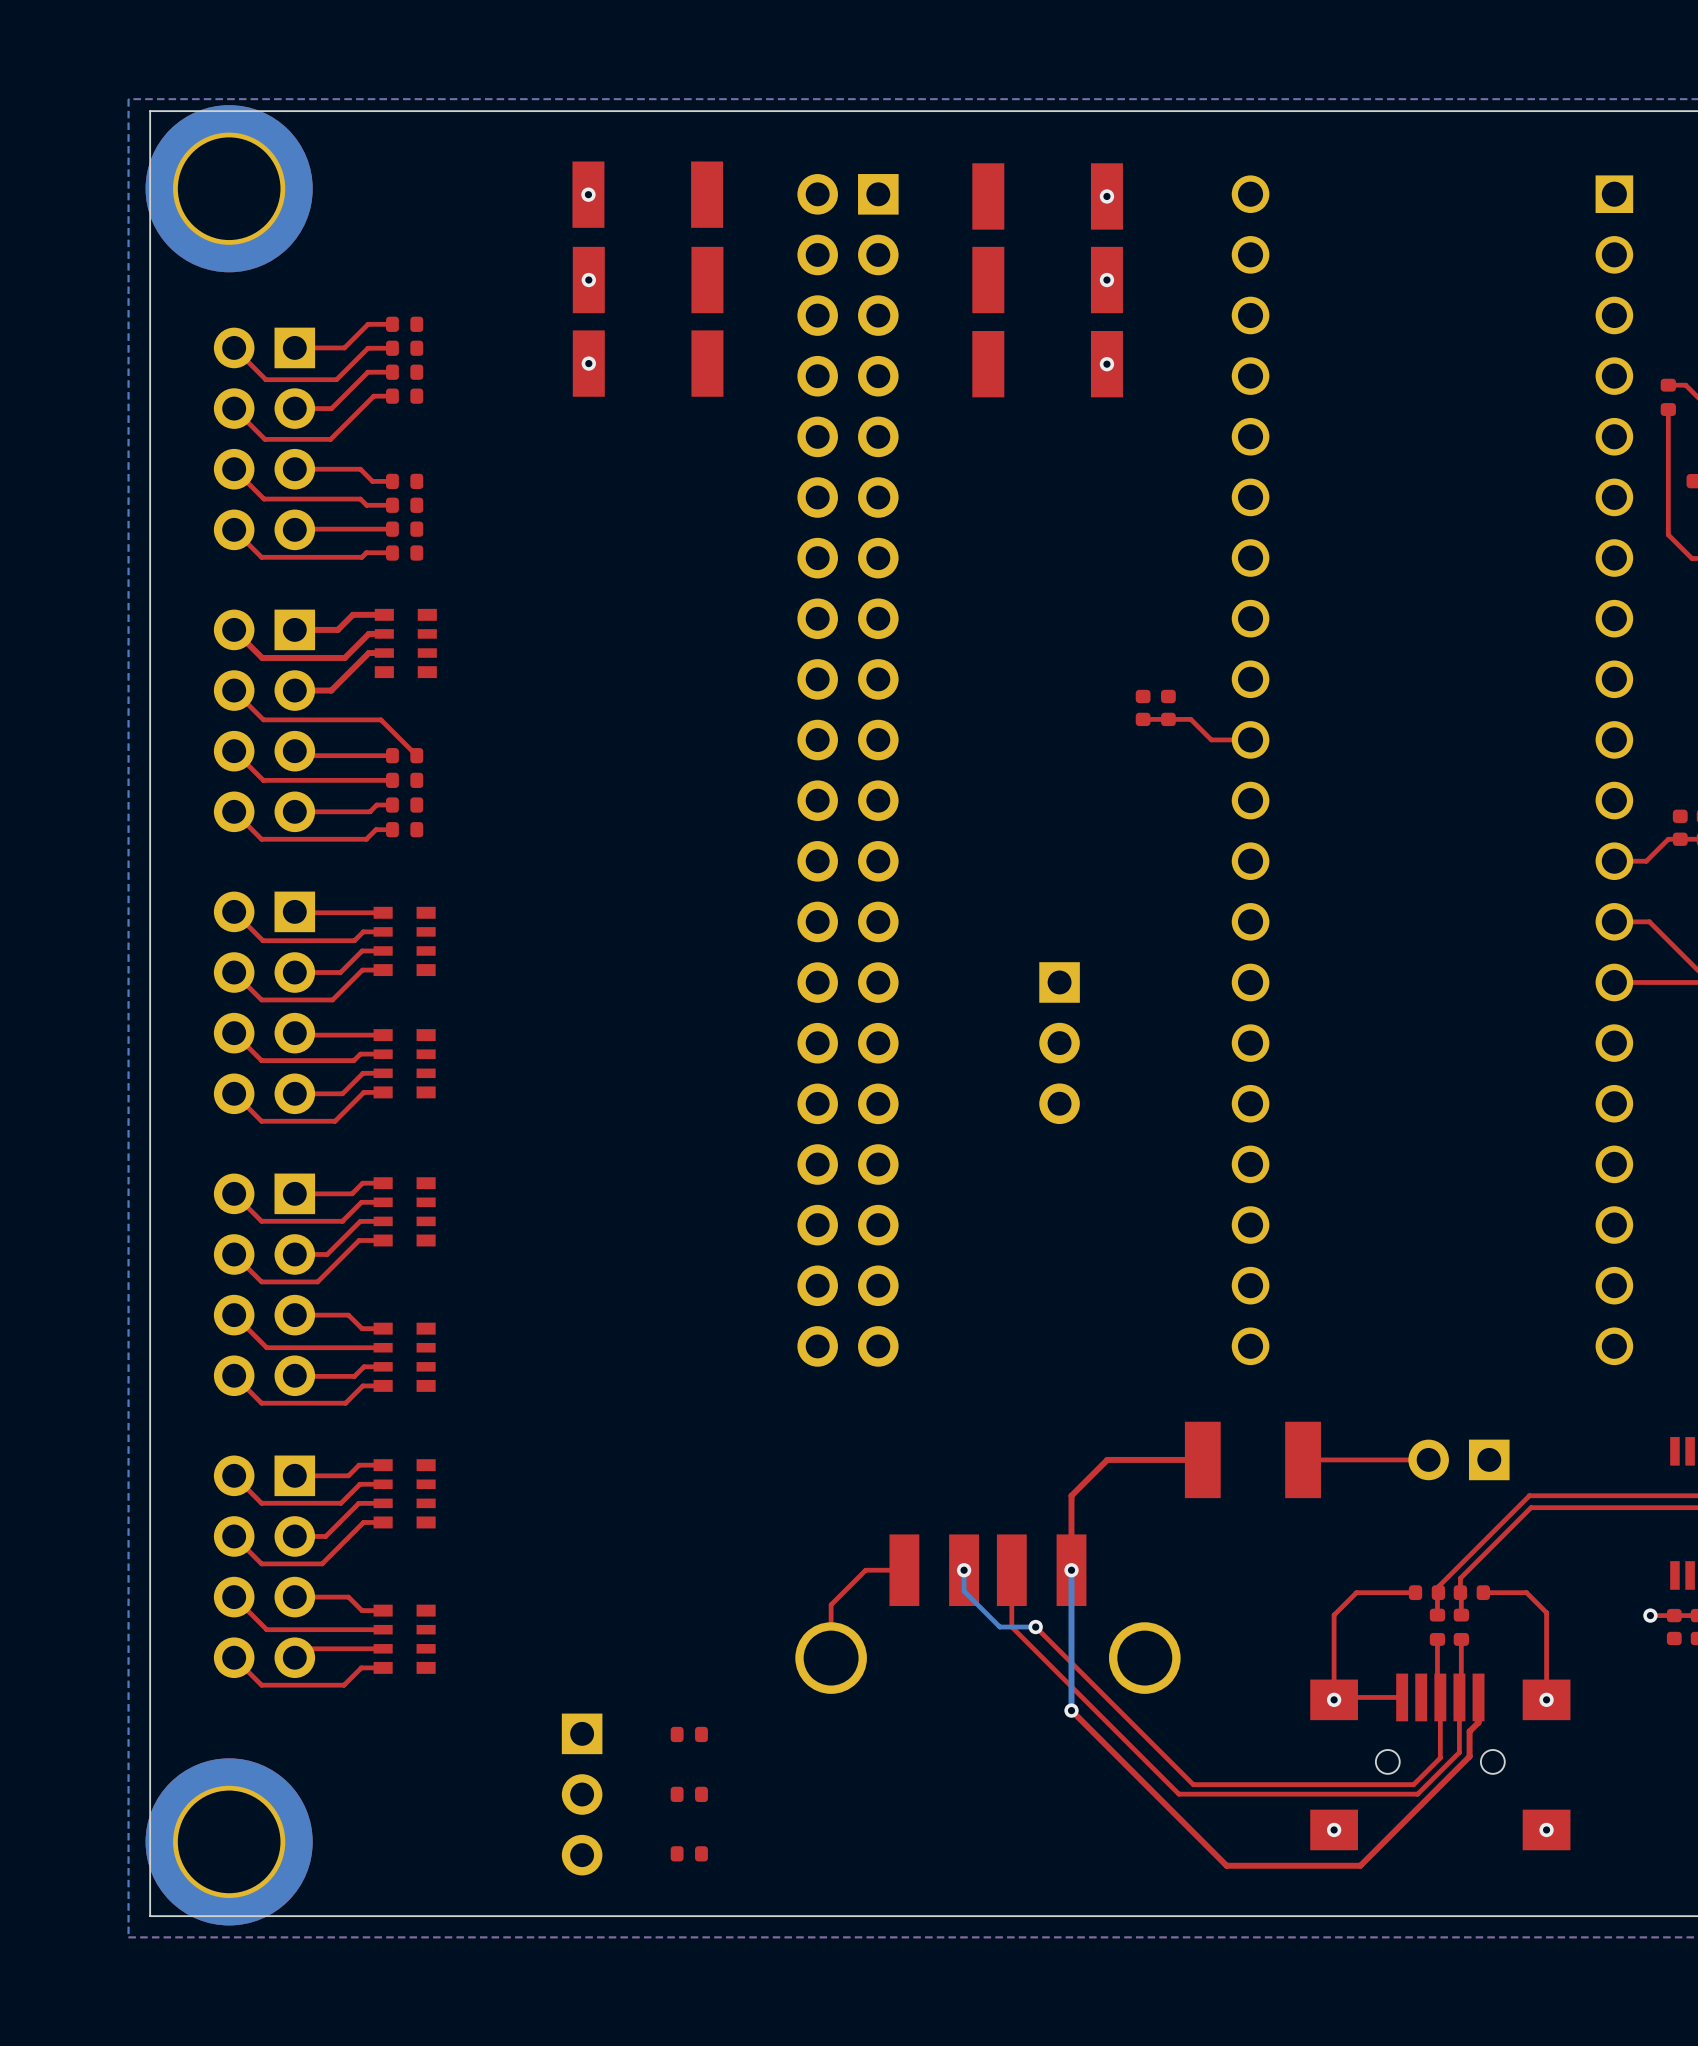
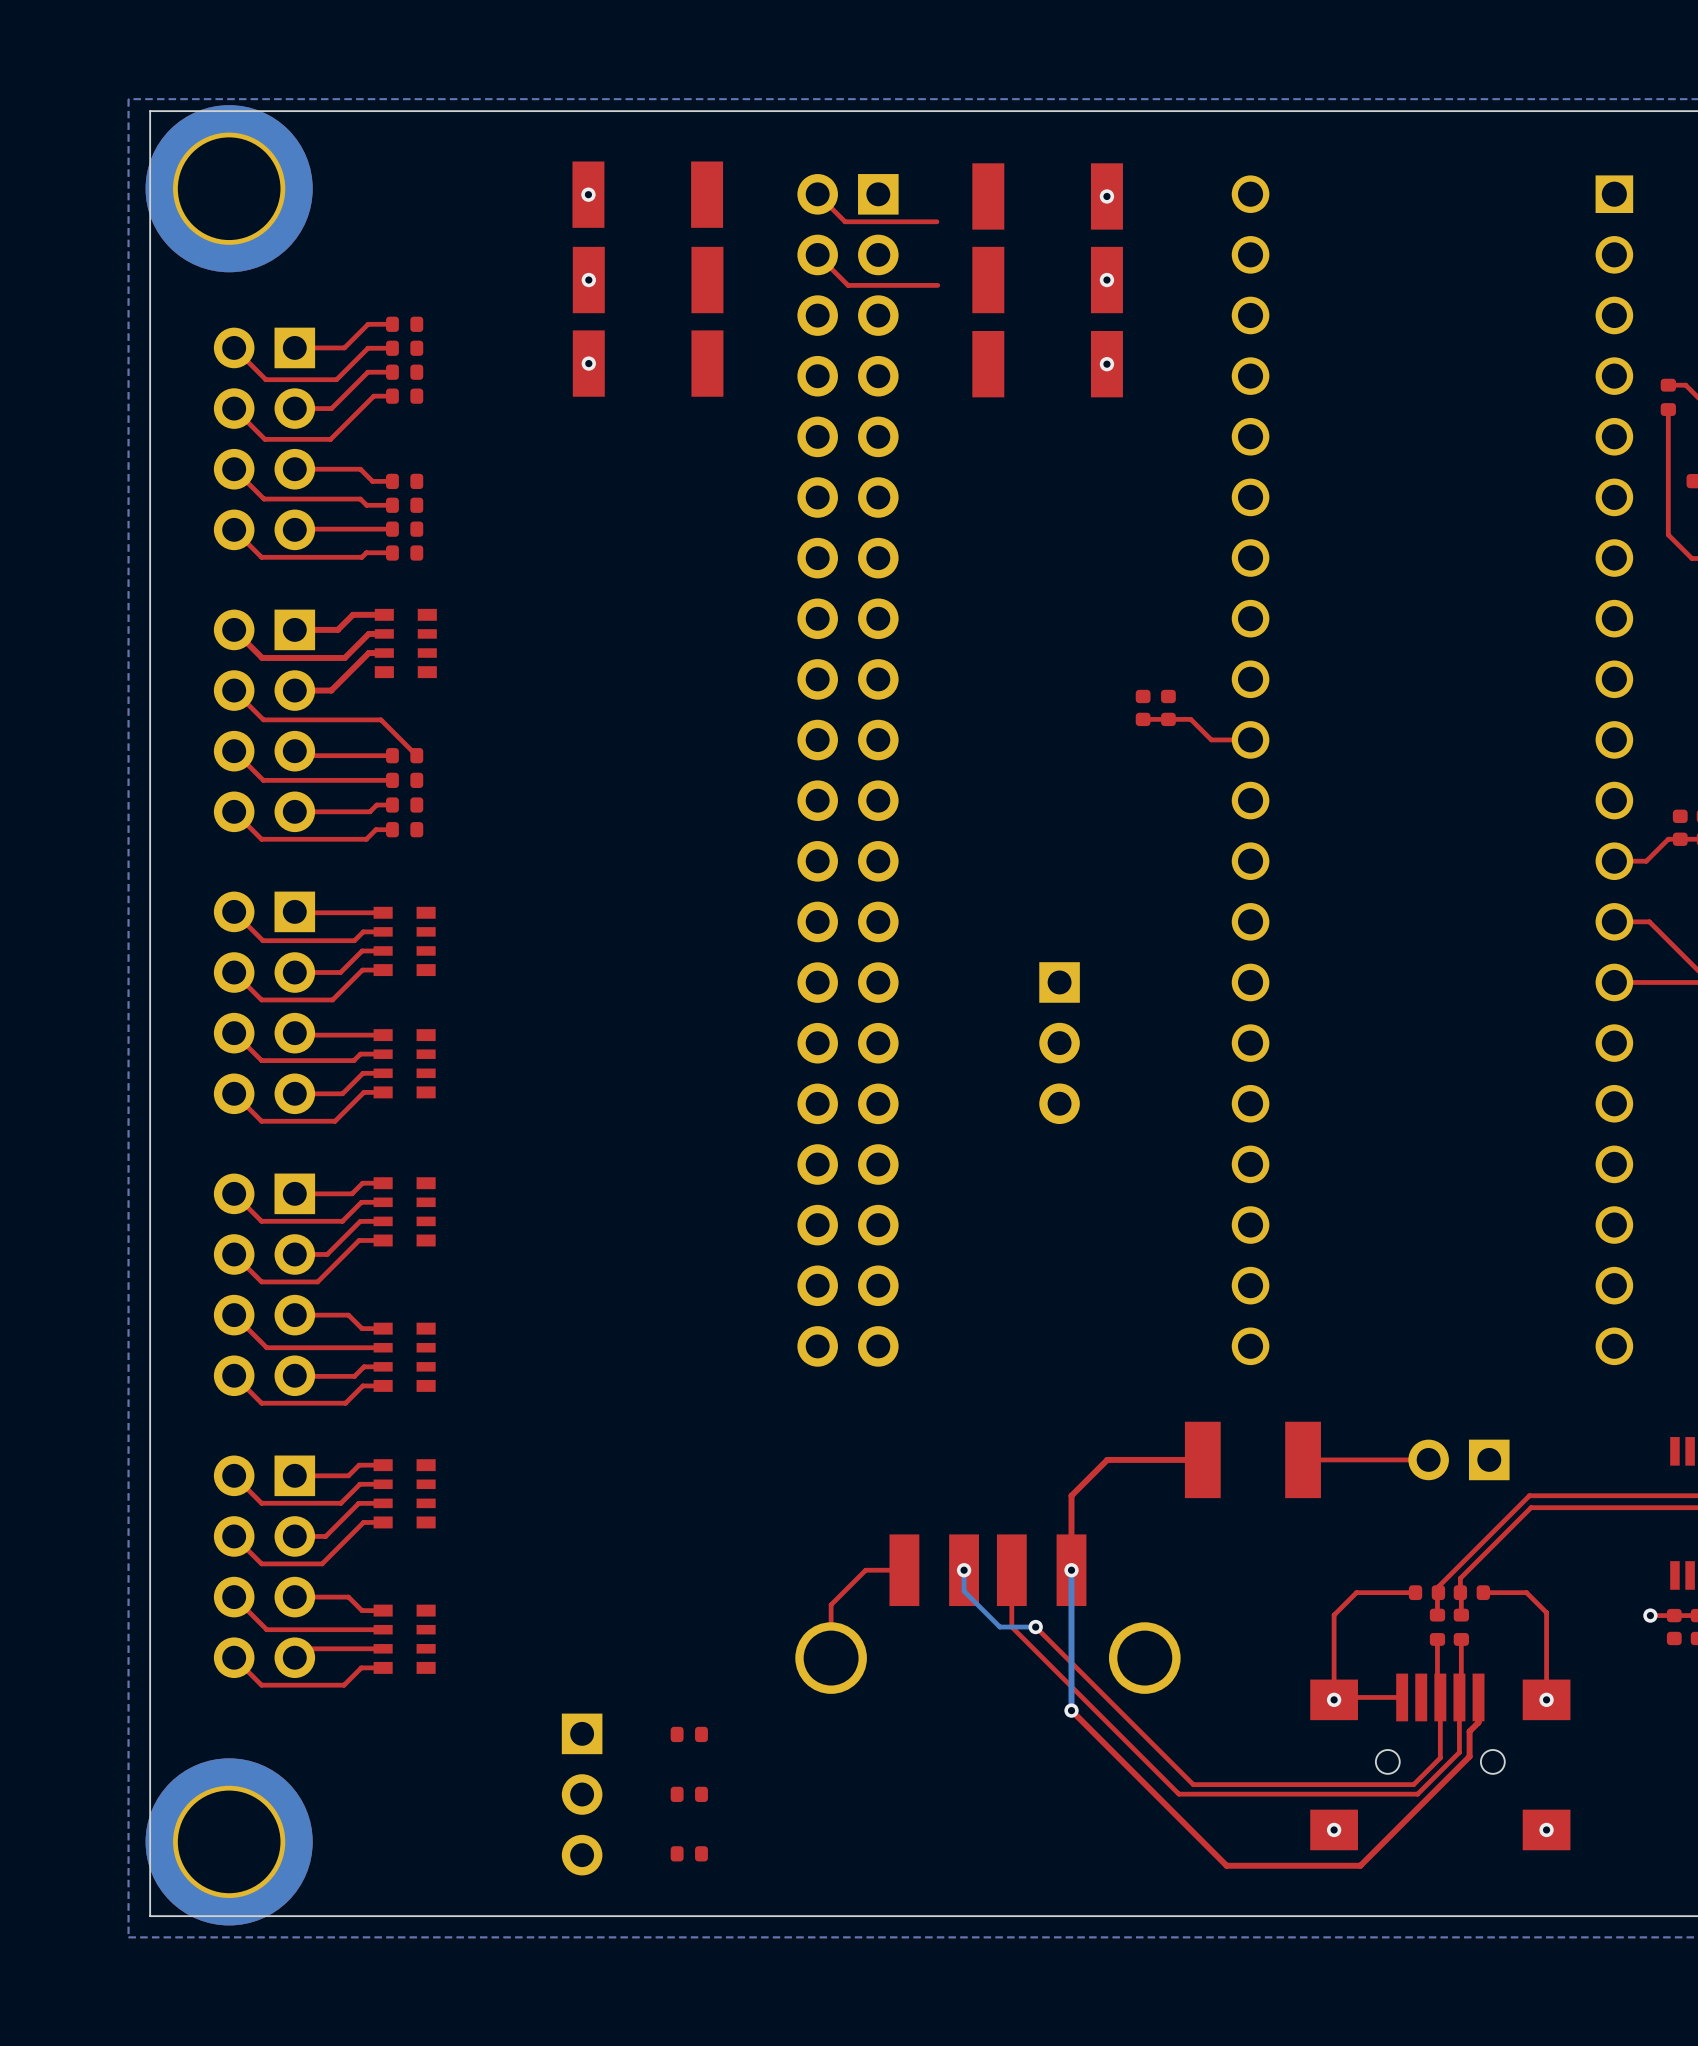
top track: none -> (817, 194) (845, 221) (936, 221)
top track: none -> (817, 254) (848, 285) (937, 285)

